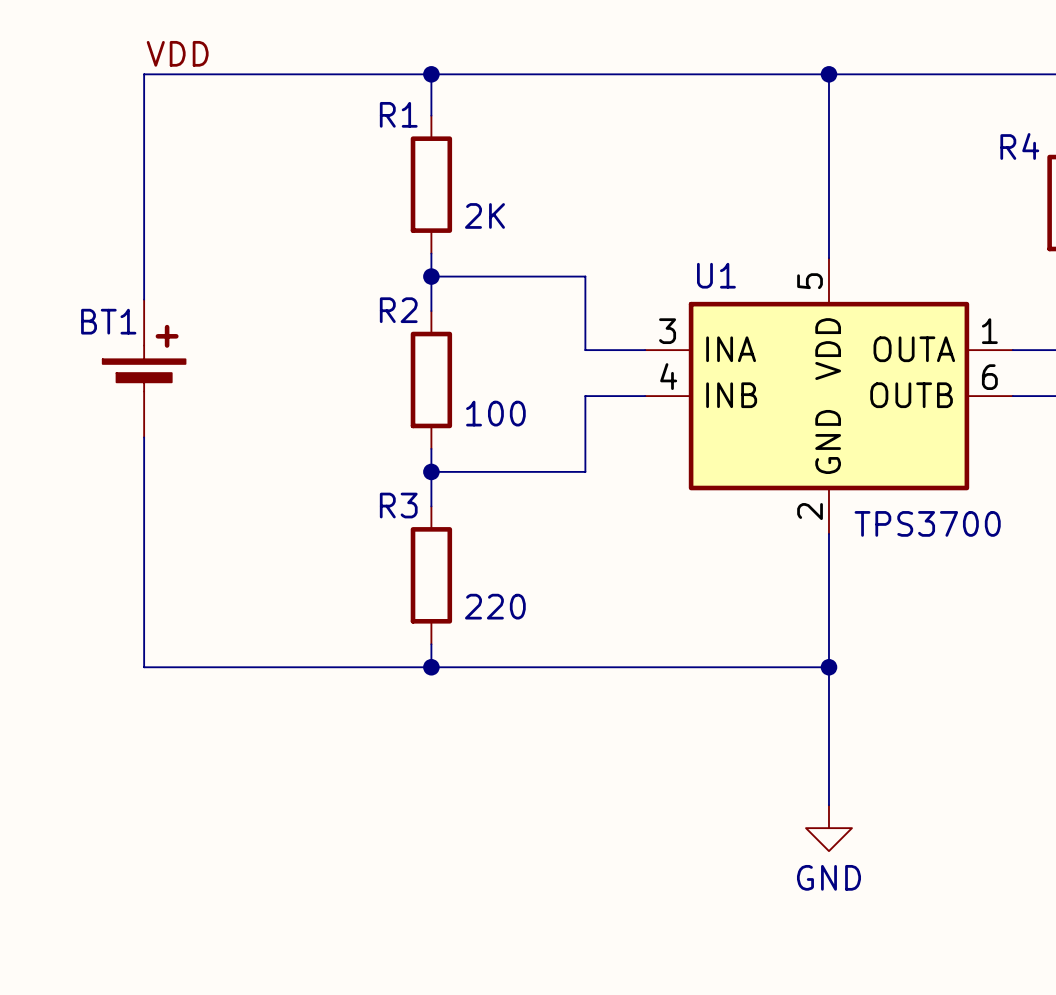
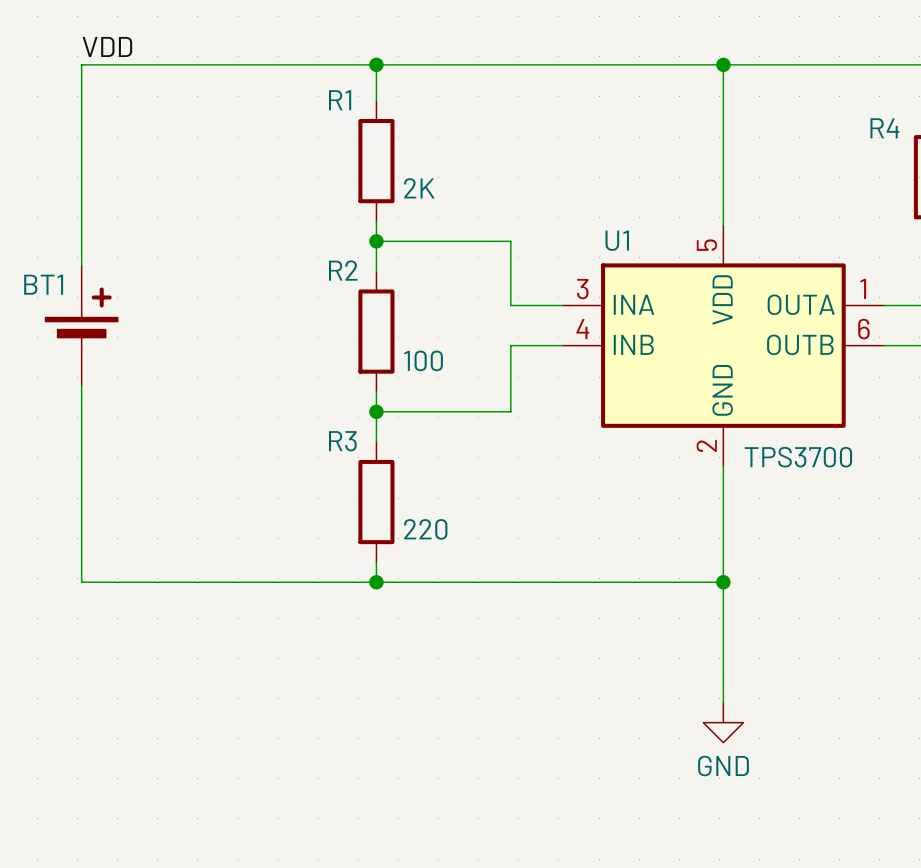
label position: VDD (177, 53) -> VDD (107, 46)
wire: (144, 74) (144, 299) -> (125, 64) (81, 64) (81, 265)
BT1 position: (144, 368) -> (81, 325)
wire: (144, 437) (144, 667) -> (81, 385) (81, 582) (125, 582)

